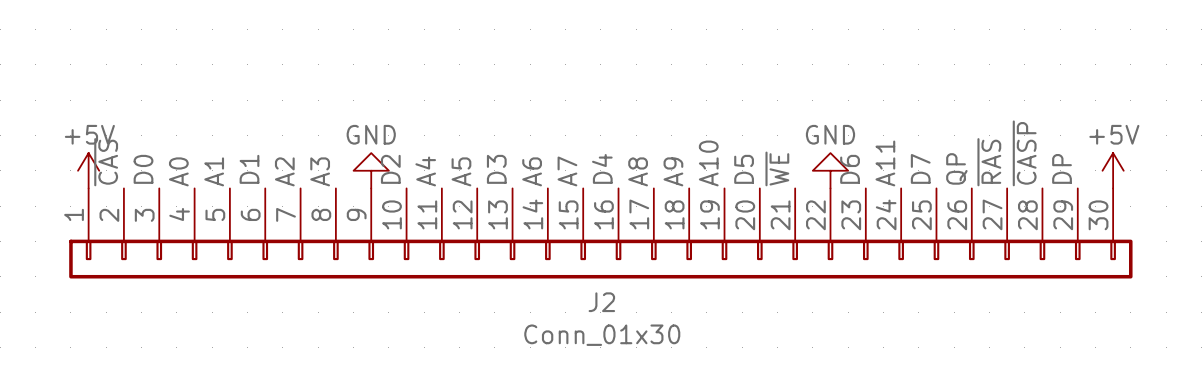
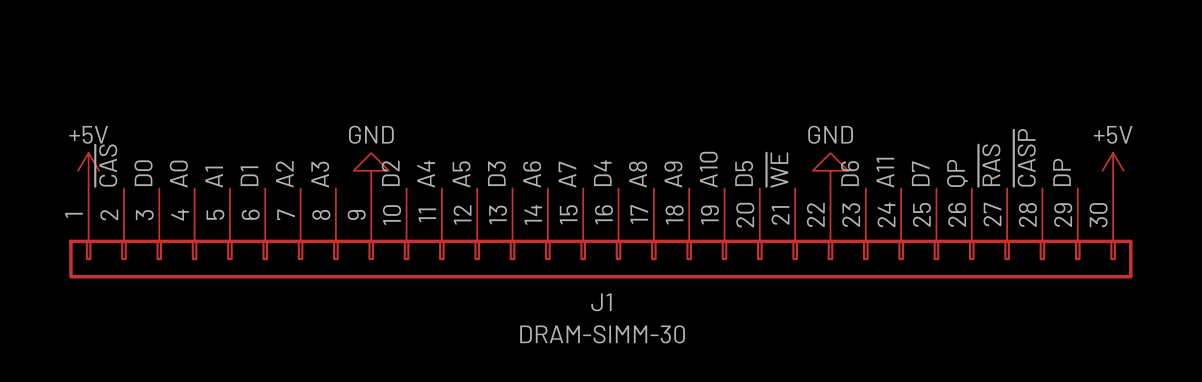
J2 name: J2 (601, 302) -> J1 (601, 302)
J2 value: Conn_01x30 (602, 335) -> DRAM-SIMM-30 (602, 334)

